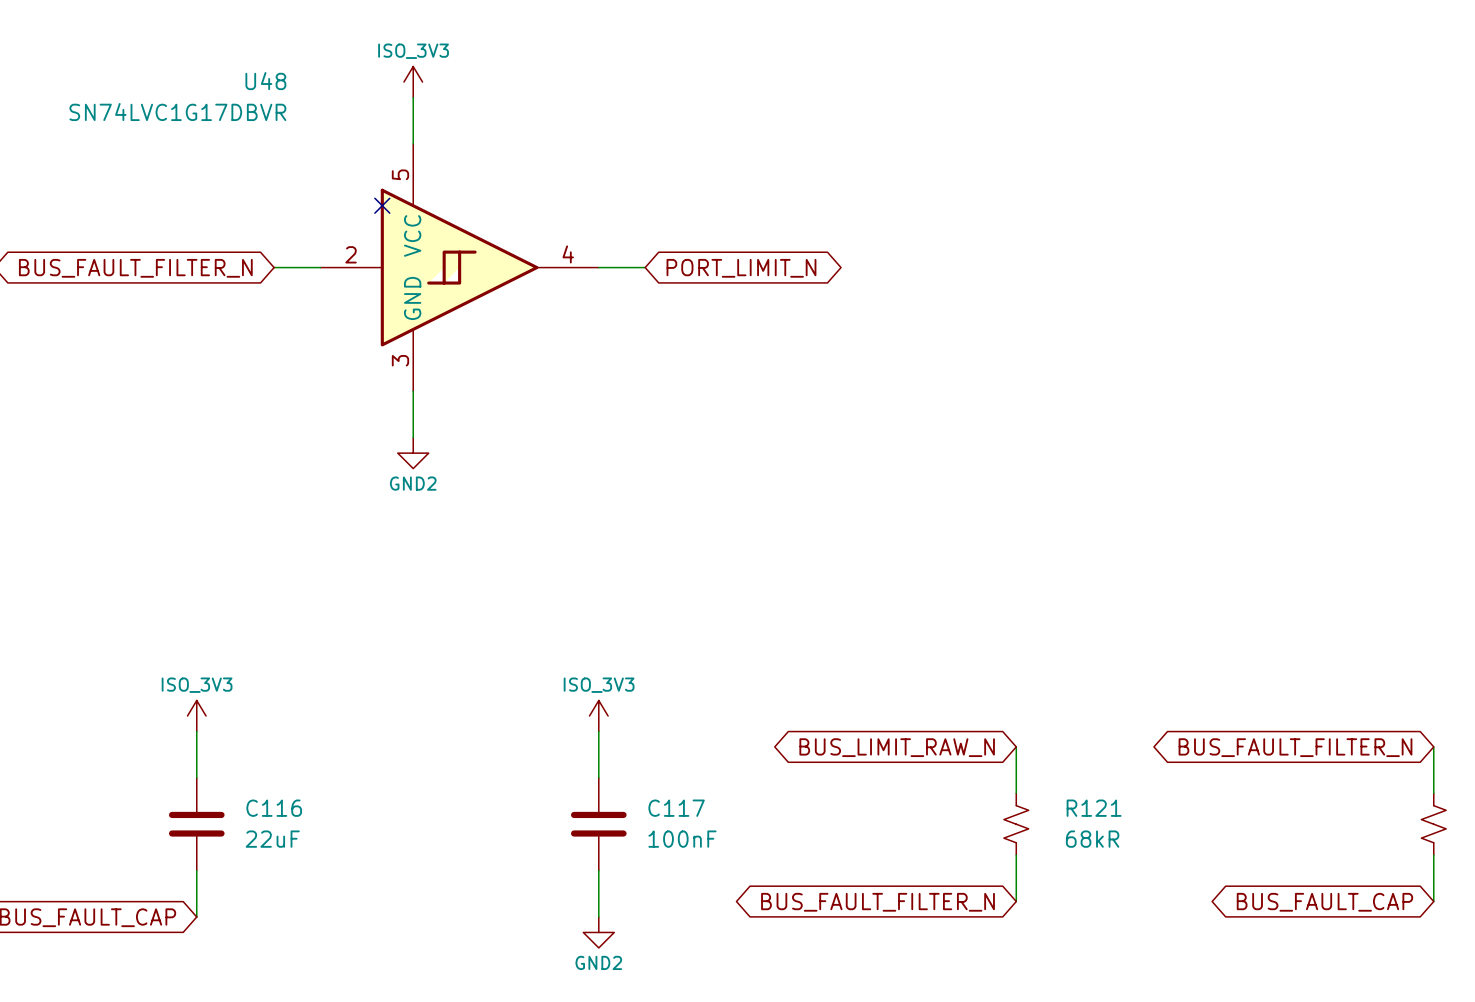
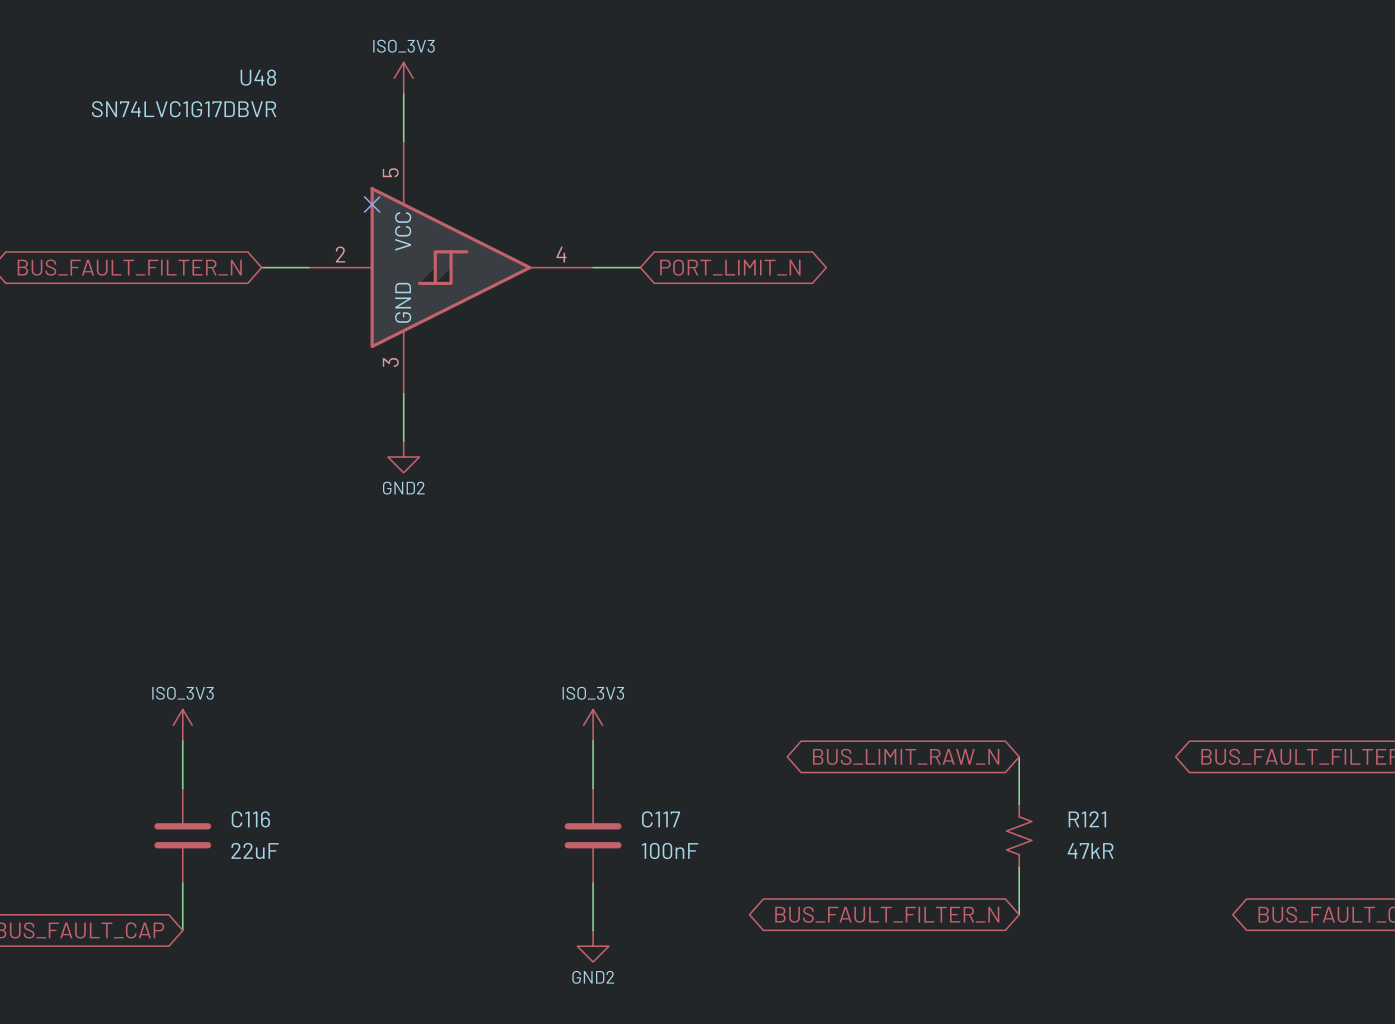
R121 value: 68kR (1092, 839) -> 47kR (1090, 850)

